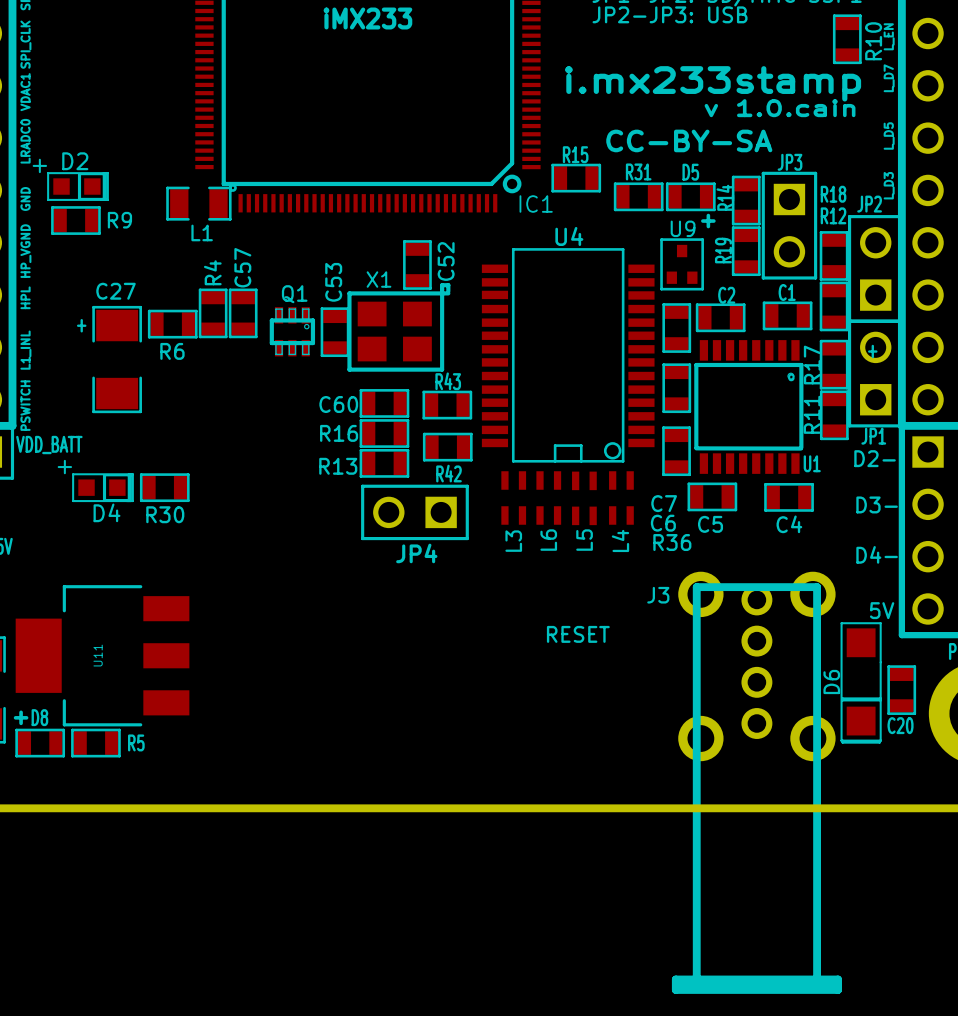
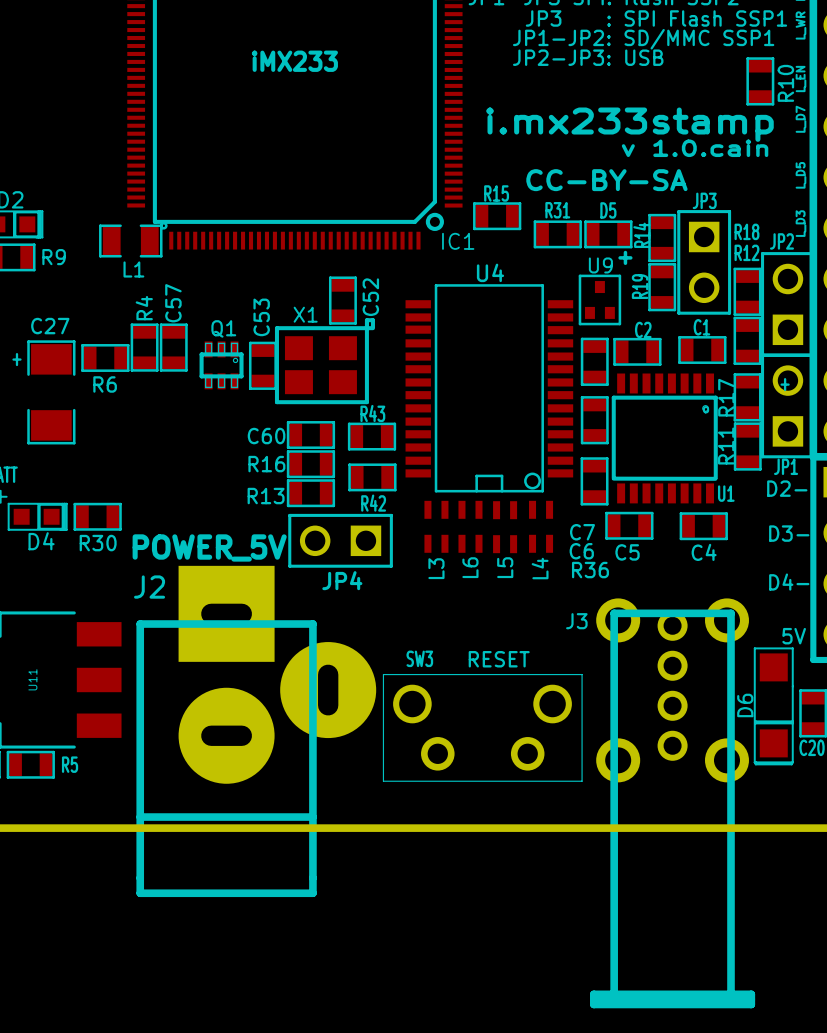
SW3: none -> (482, 727)
J2: none -> POWER_5V (256, 731)

